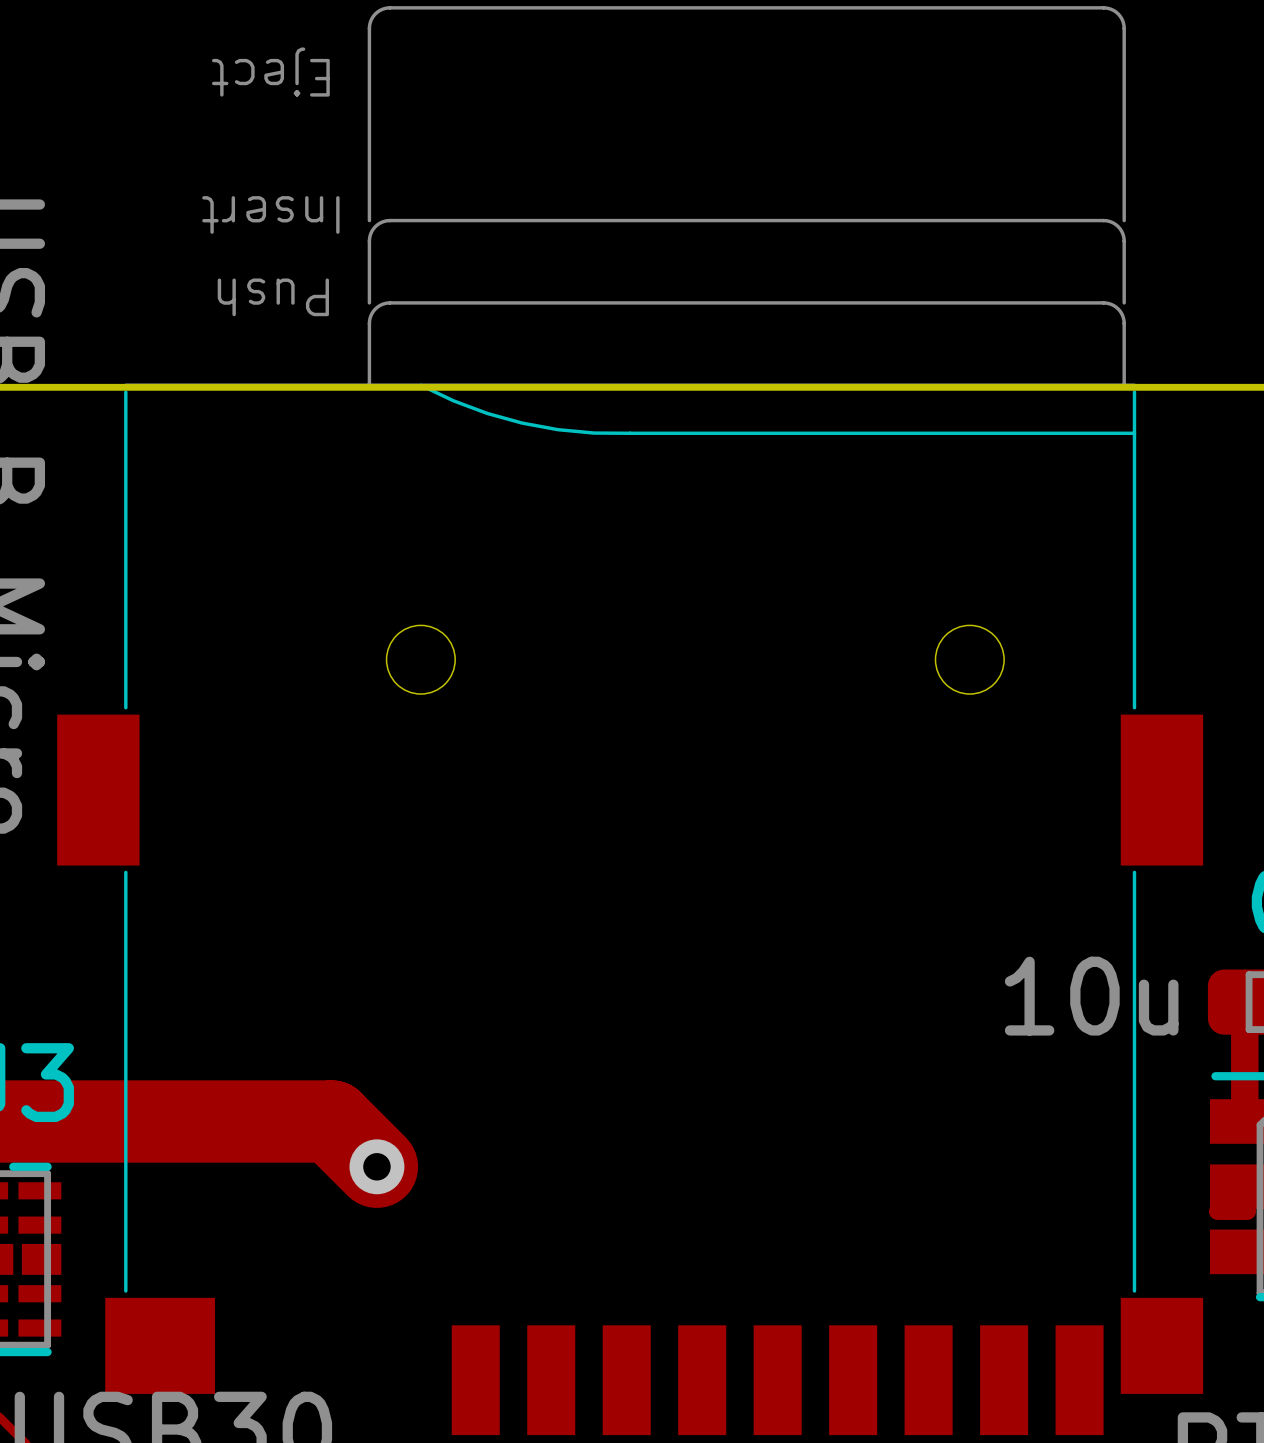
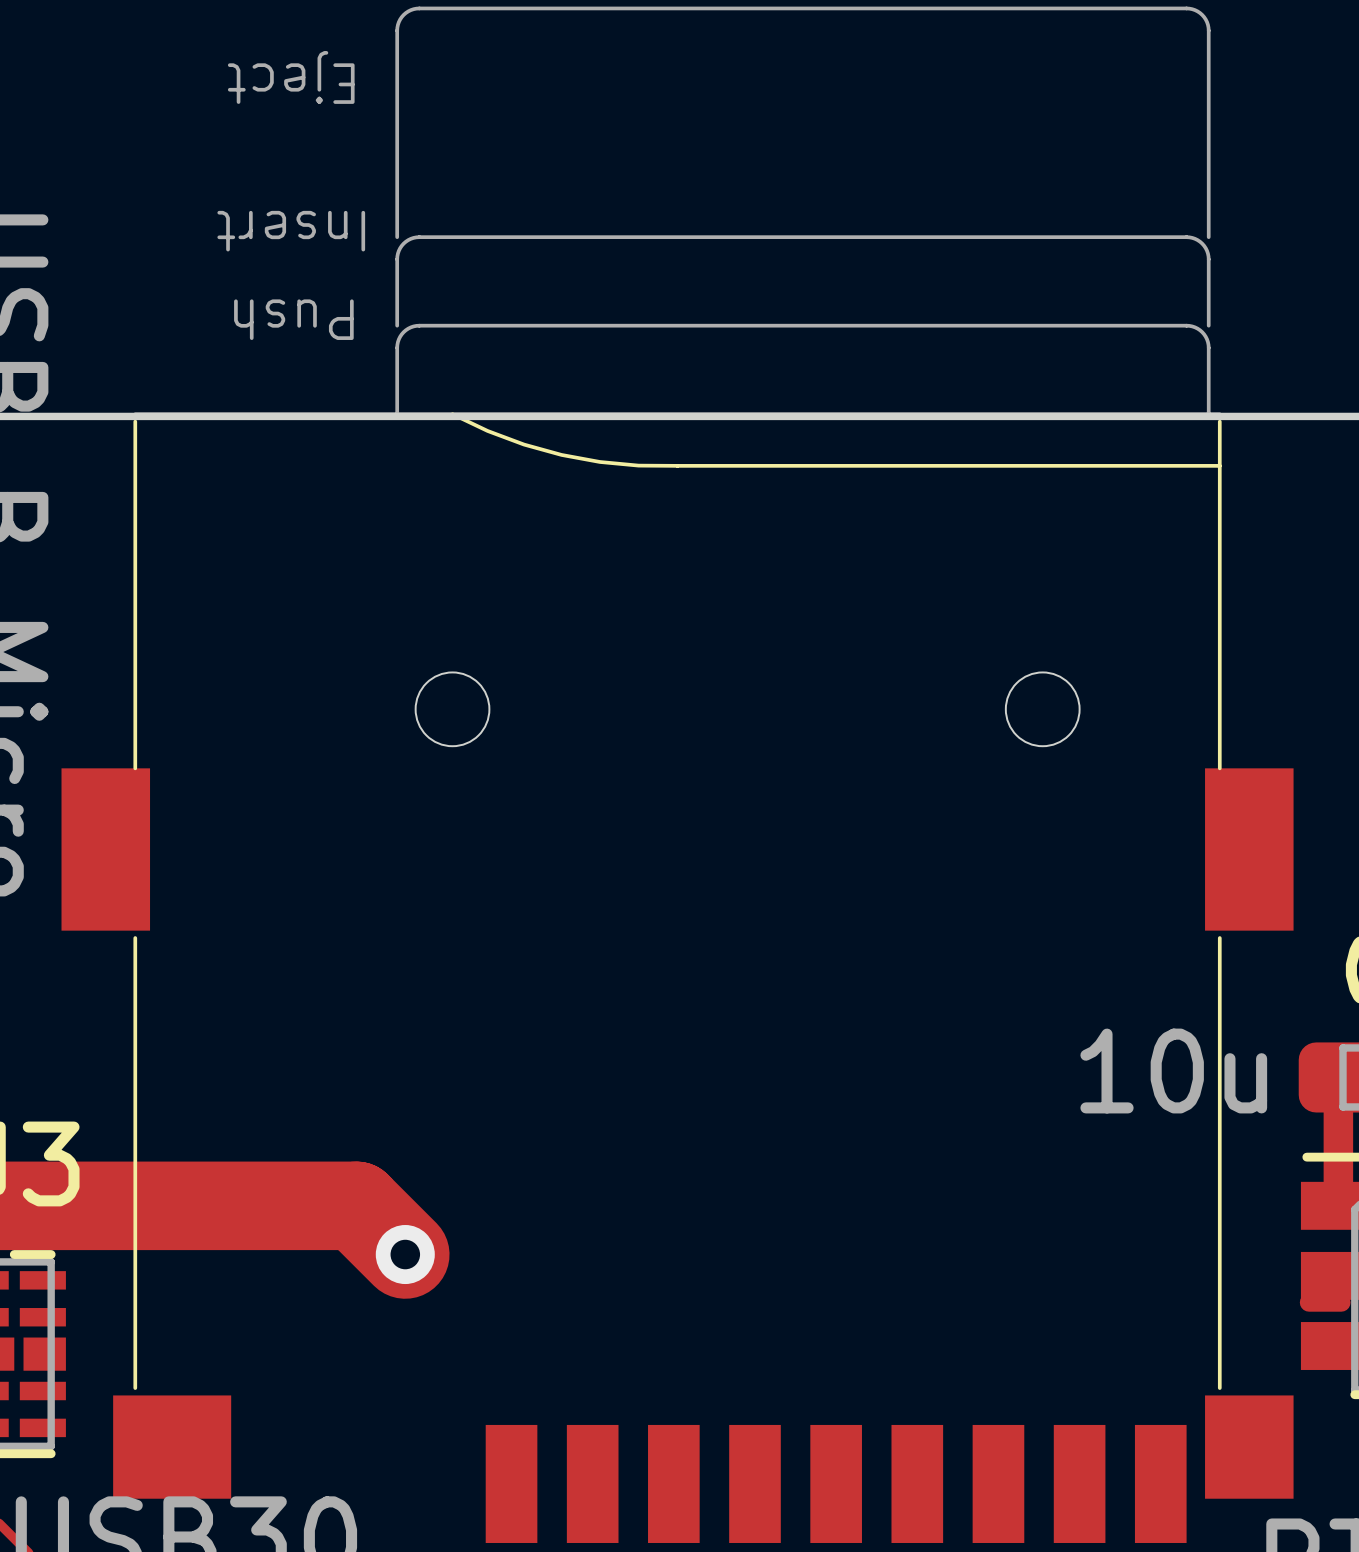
part footprint: [57, 6, 1204, 1436] -> [61, 6, 1294, 1543]

